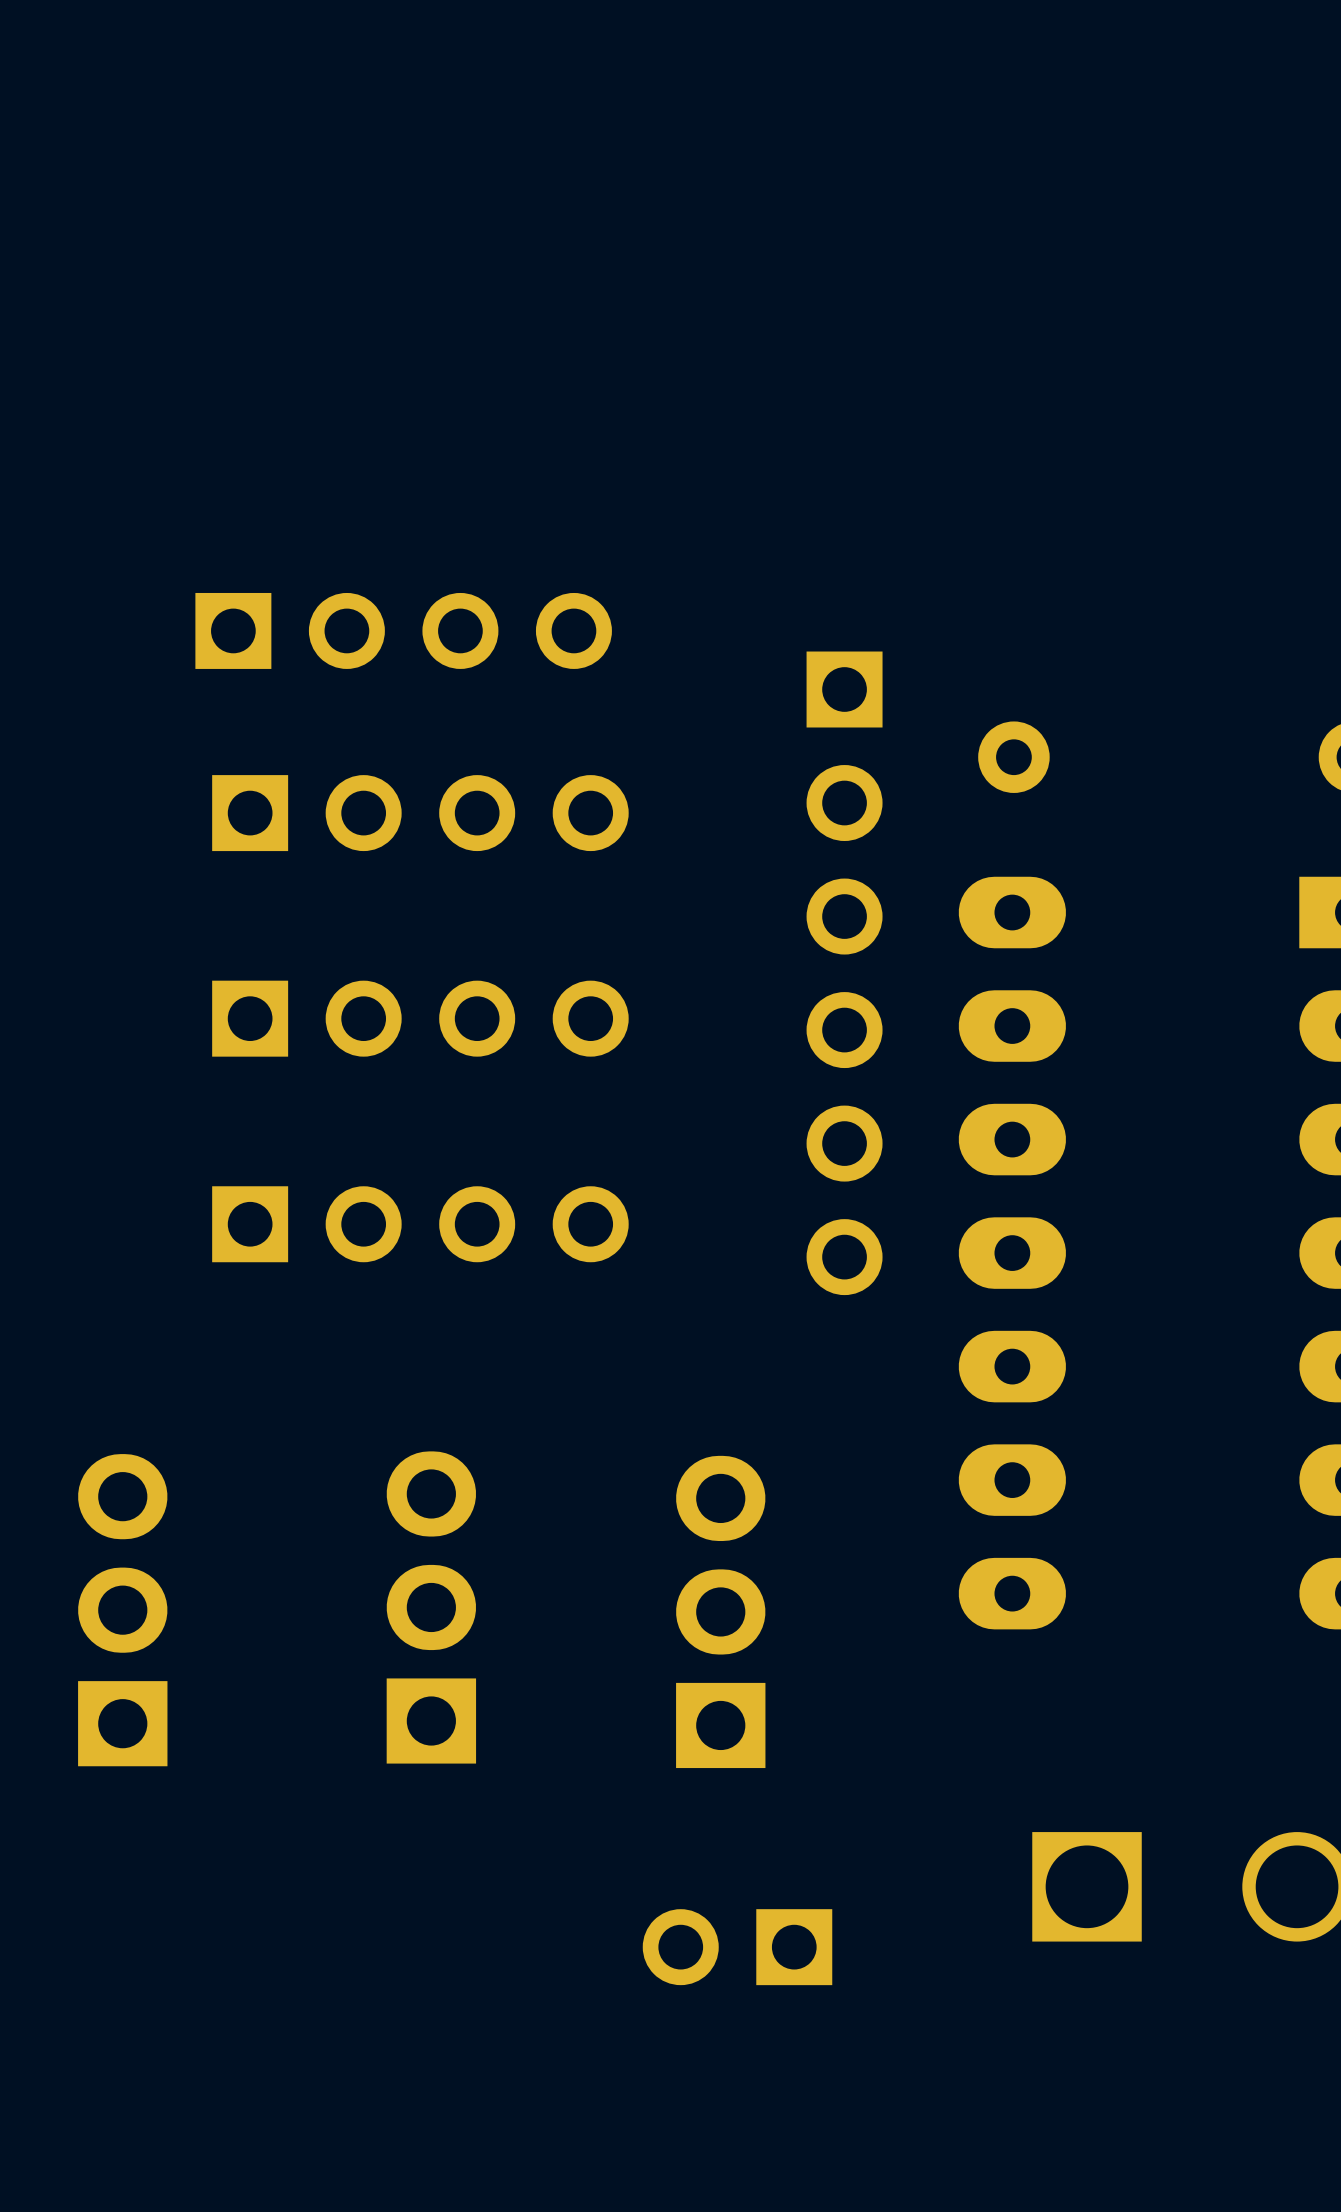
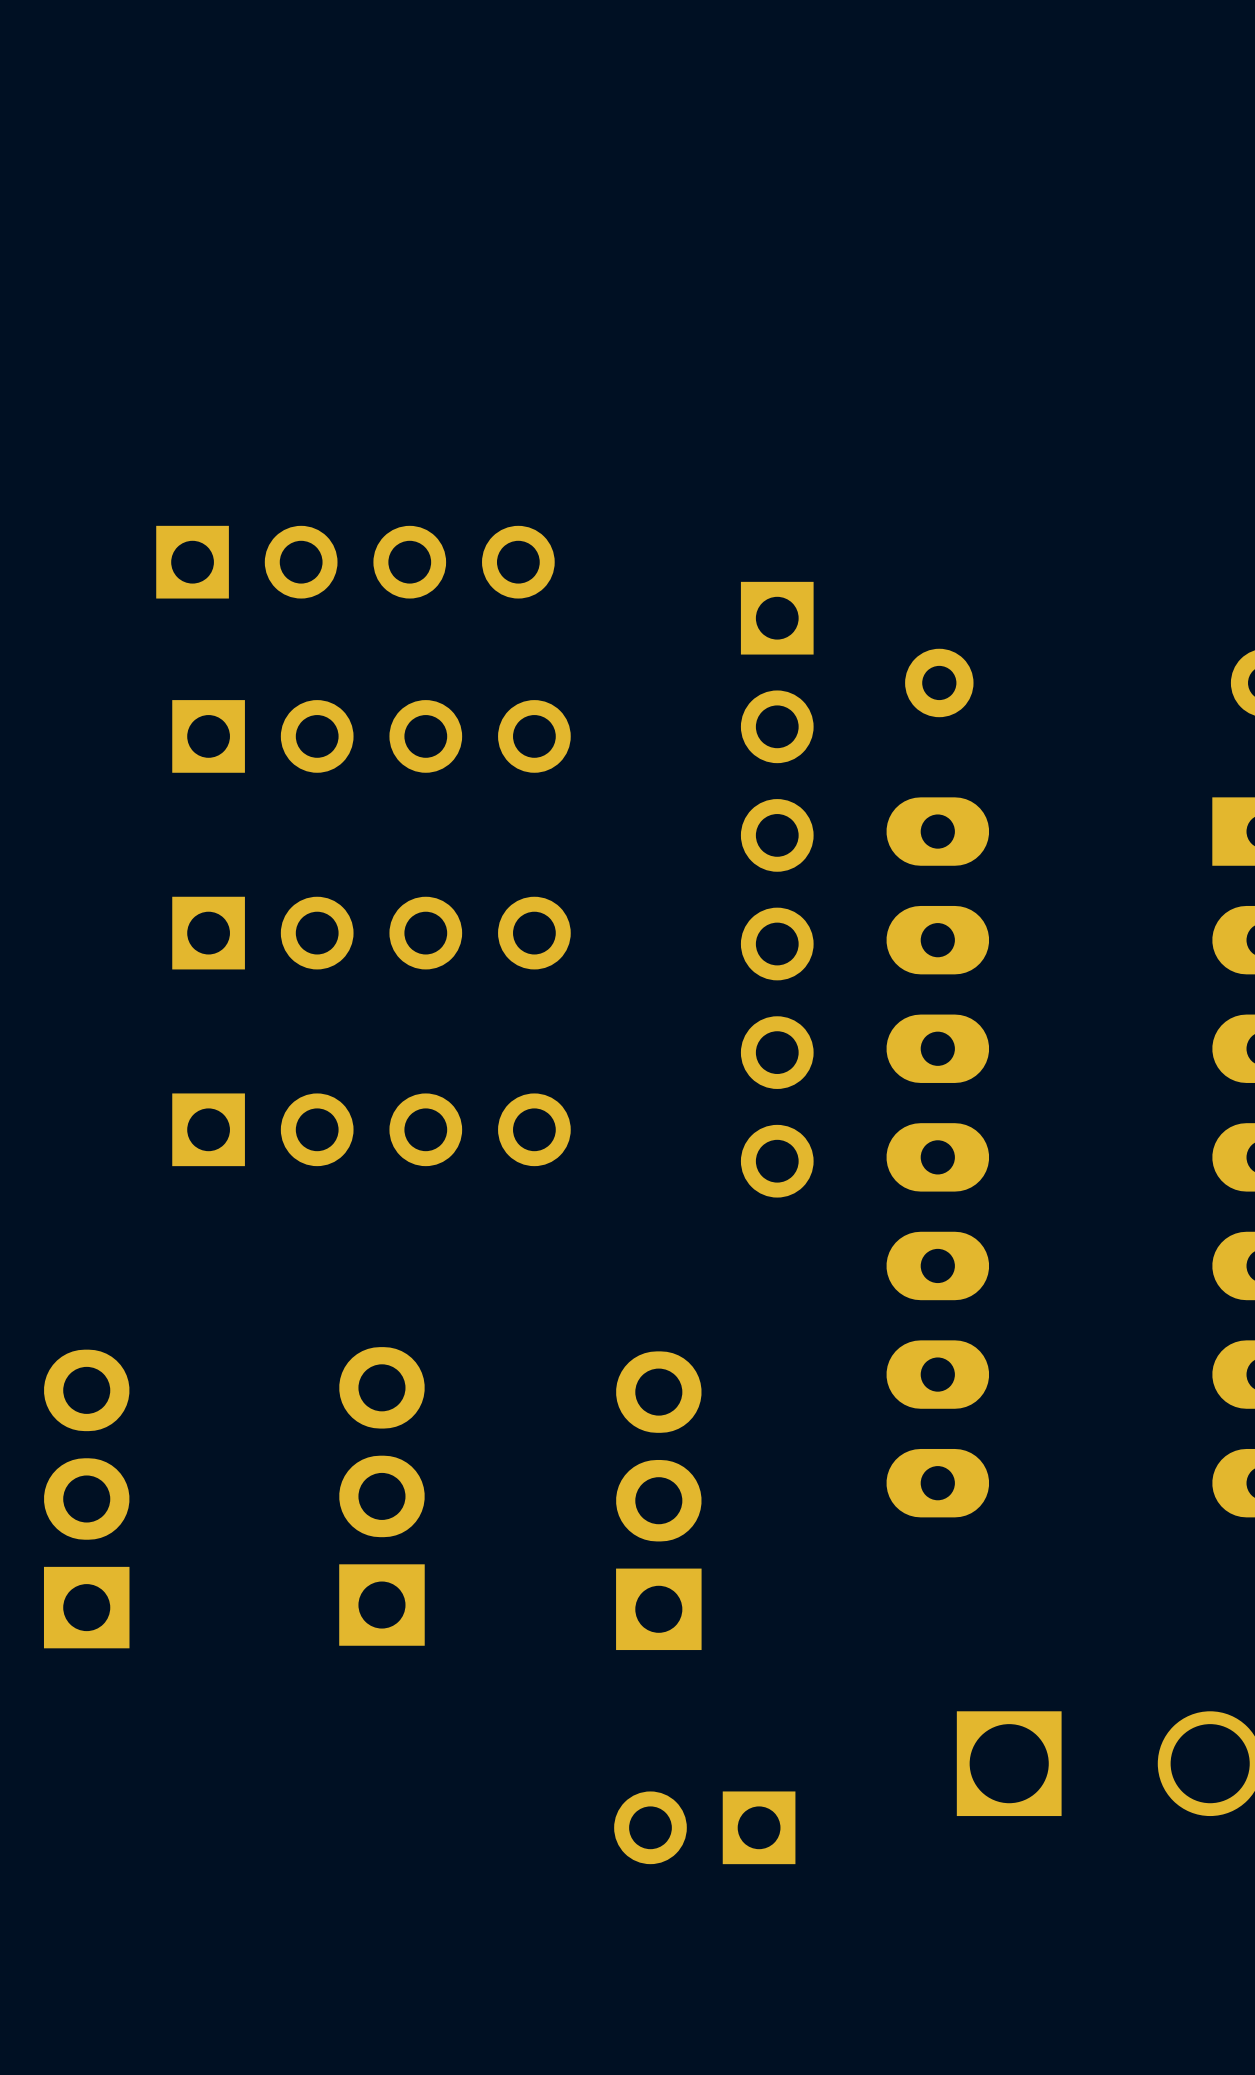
part position: (737, 1947) -> (704, 1827)

